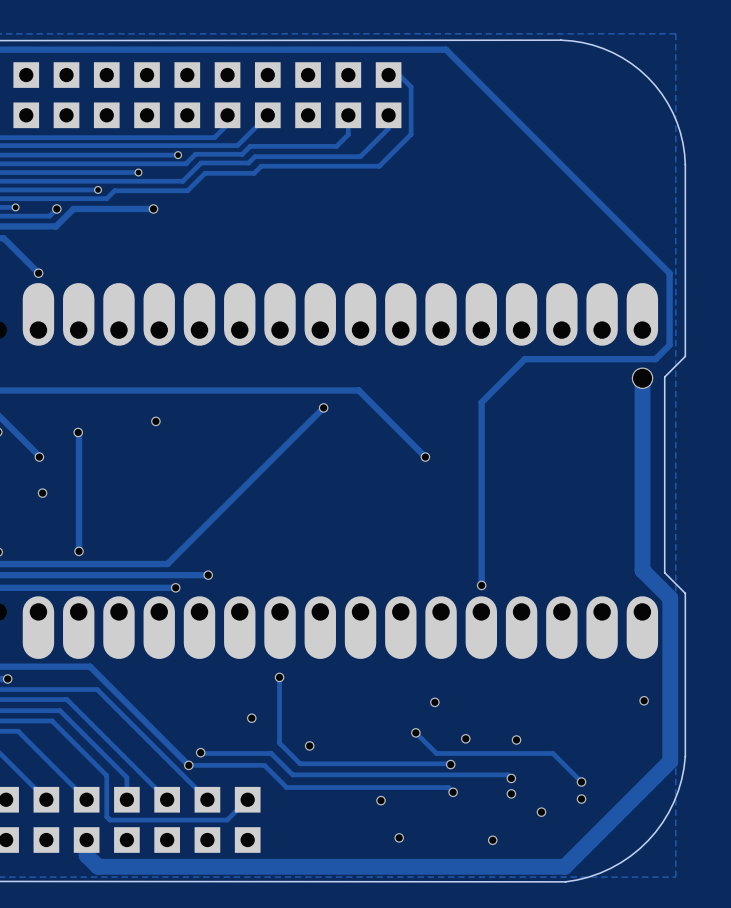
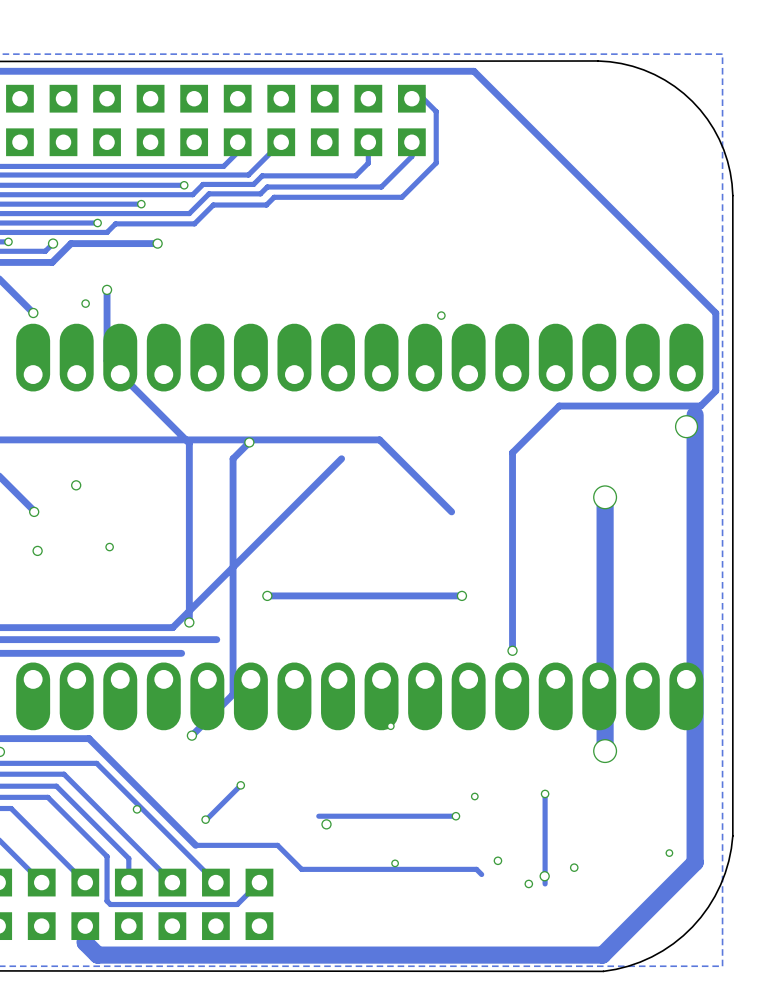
track: none -> (107, 289) (107, 361) (189, 443) (189, 622)
via: none -> (107, 289)
via: none -> (85, 303)
via: none -> (441, 315)
board edge: (685, 356) (664, 377) (664, 572) (685, 593) -> (732, 403) (732, 659)
track: (642, 378) (642, 570) (670, 598) (670, 761) (650, 781) -> (695, 415) (695, 862)
track: none -> (249, 442) (233, 458) (233, 694) (191, 735)
via: none -> (249, 442)
via: (323, 407) -> none
via: (155, 421) -> none
track: (78, 432) (79, 551) -> none
track: none -> (605, 497) (605, 751)
via: none -> (605, 497)
via position: (425, 457) -> (461, 595)
via: none -> (109, 547)
via: none -> (267, 595)
track: none -> (461, 595) (267, 595)
via: (79, 551) -> none
via: none -> (189, 622)
via: (208, 575) -> none
via: (175, 587) -> none
via: none -> (390, 726)
via: none -> (191, 735)
track: (279, 677) (279, 743) (300, 763) (450, 764) -> none
via: (279, 677) -> none
via: none -> (605, 751)
via: (644, 700) -> none
via: (434, 702) -> none
track: none -> (240, 785) (205, 819)
via: none -> (240, 785)
track: none -> (545, 793) (545, 883)
via: none -> (545, 793)
via: (251, 718) -> none
via: none -> (474, 796)
via: none -> (137, 809)
track: (415, 732) (436, 753) (552, 753) (581, 782) -> none
via: (415, 732) -> none
track: none -> (455, 816) (318, 816)
via: none -> (455, 816)
via: (465, 738) -> none
via: (516, 740) -> none
via: none -> (205, 819)
track: (200, 752) (271, 753) (292, 774) (507, 774) (511, 778) -> none
via: (200, 752) -> none
via: (450, 764) -> none
via: (188, 765) -> none
via: none -> (669, 853)
via: (511, 778) -> none
via: none -> (497, 860)
via: none -> (395, 863)
via: (581, 782) -> none
via: none -> (574, 867)
via: (453, 792) -> none
via: (581, 799) -> none
via: (380, 800) -> none
via: none -> (528, 883)
via: (541, 812) -> none
via: (399, 837) -> none
via: (492, 840) -> none

